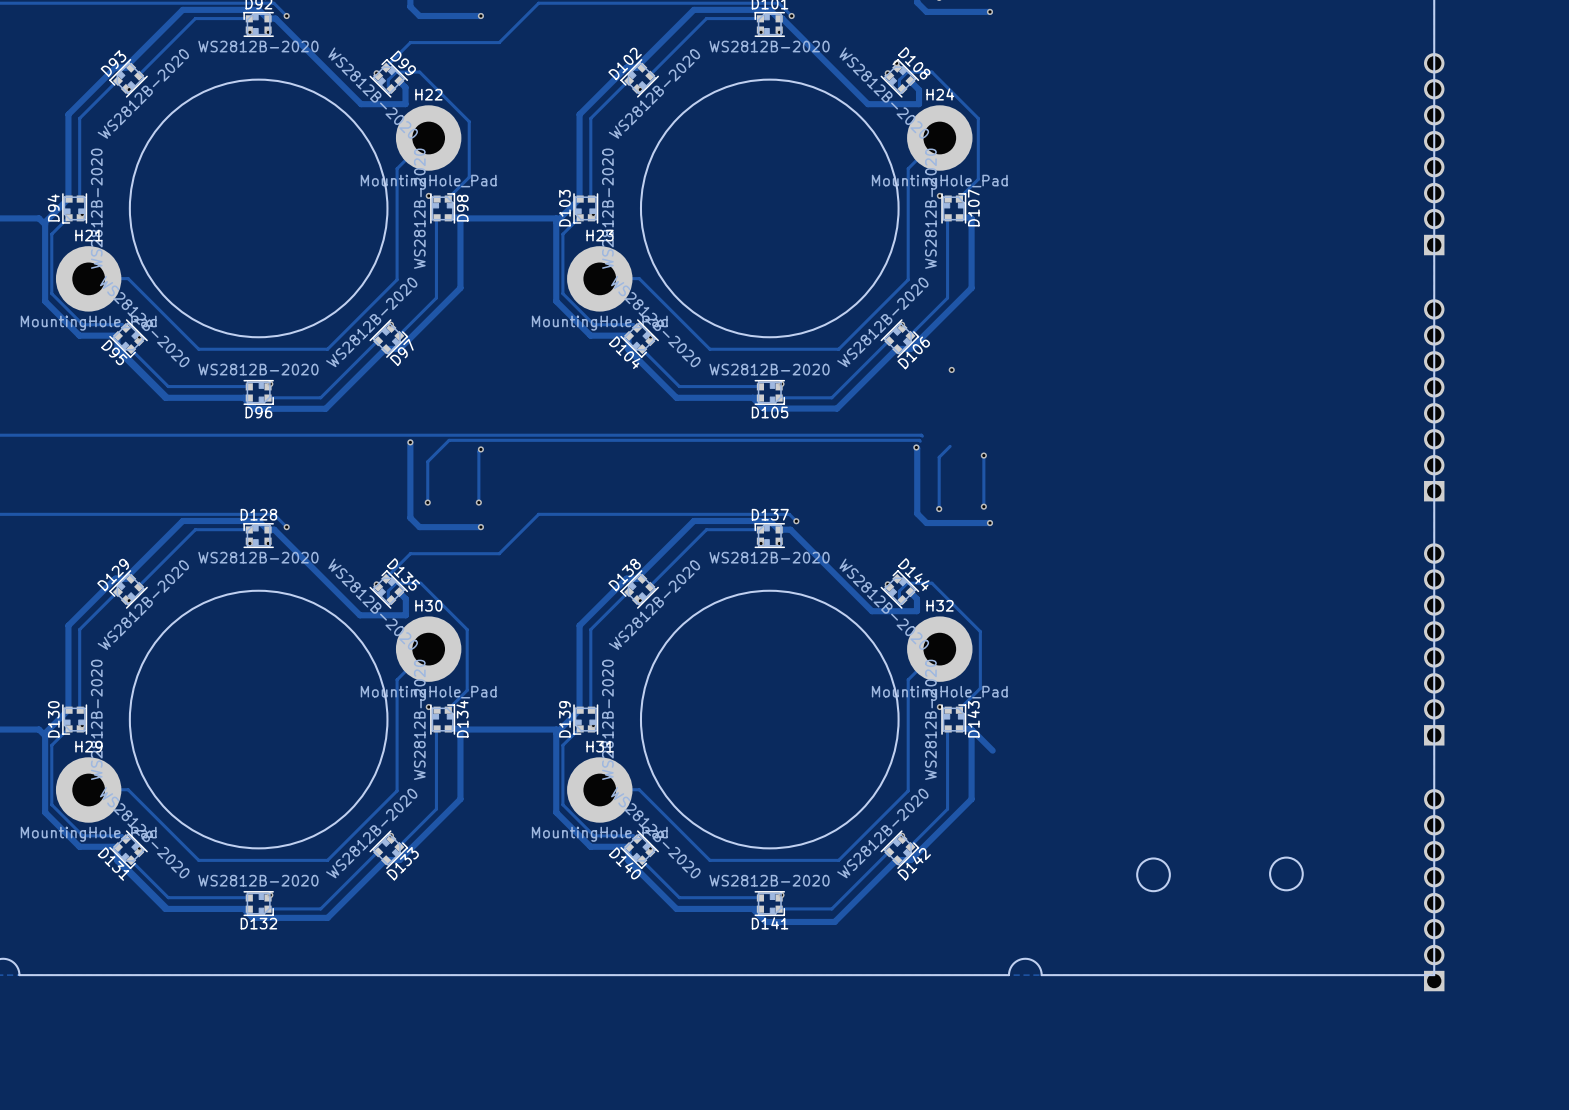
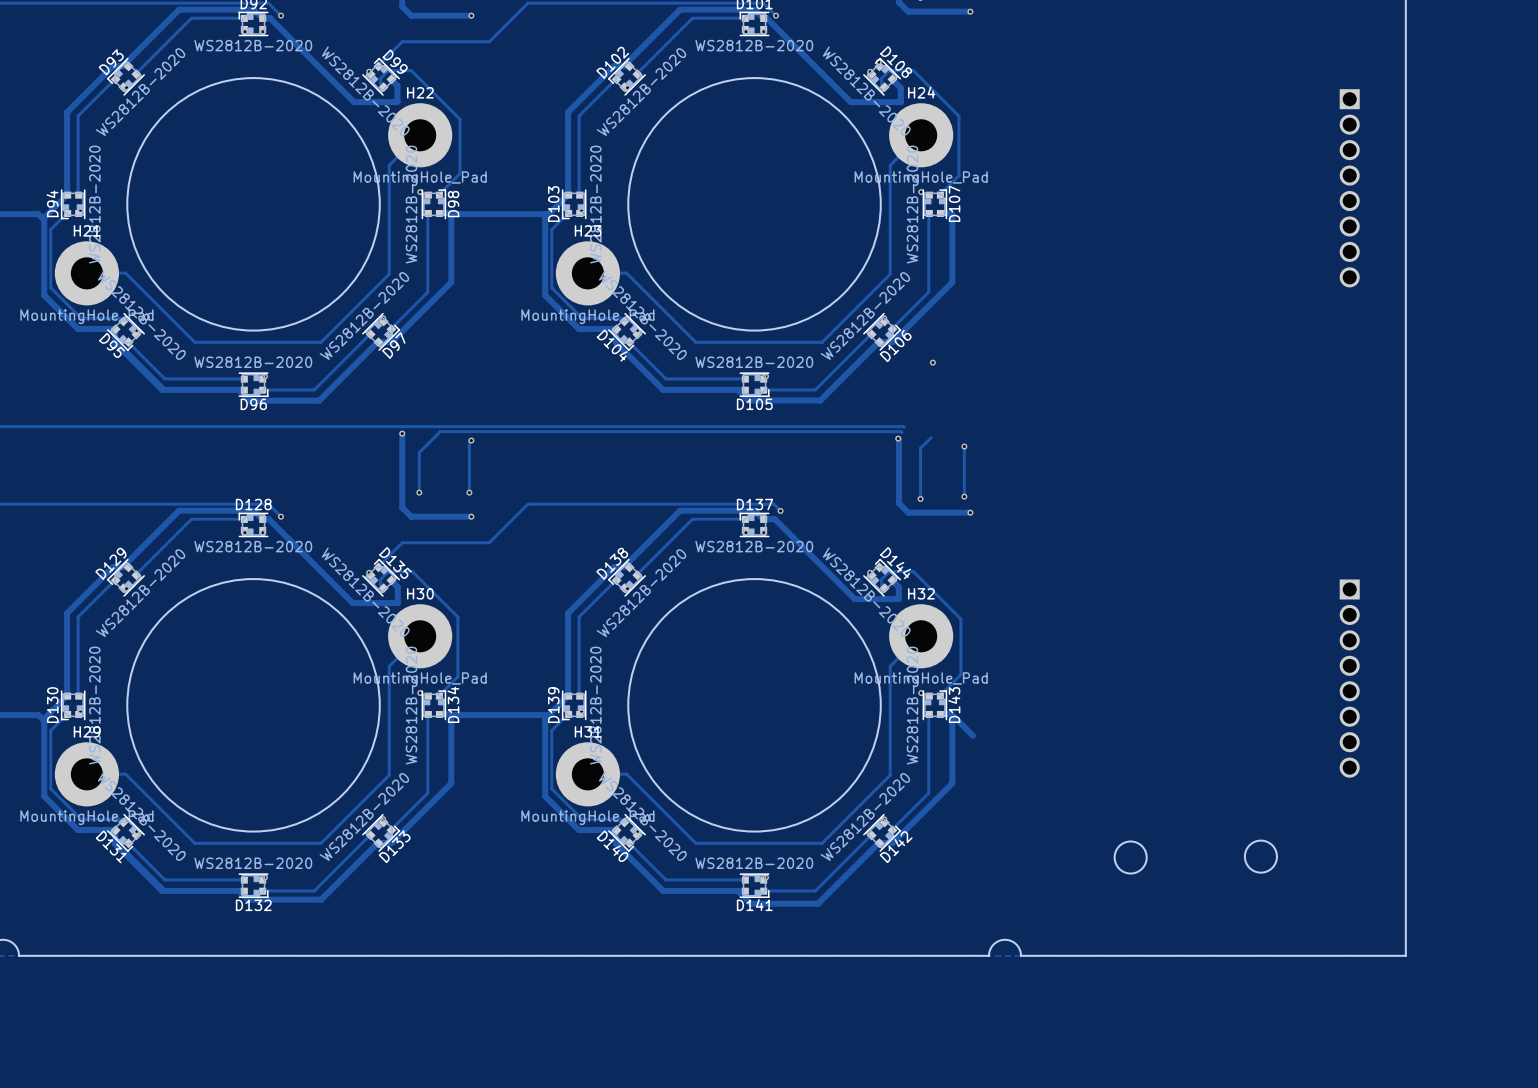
part rotation: 0° (1434, 154) -> 180° (1349, 188)
part: (1434, 400) -> none
part rotation: 0° (1434, 644) -> 180° (1349, 678)
part: (1434, 890) -> none

